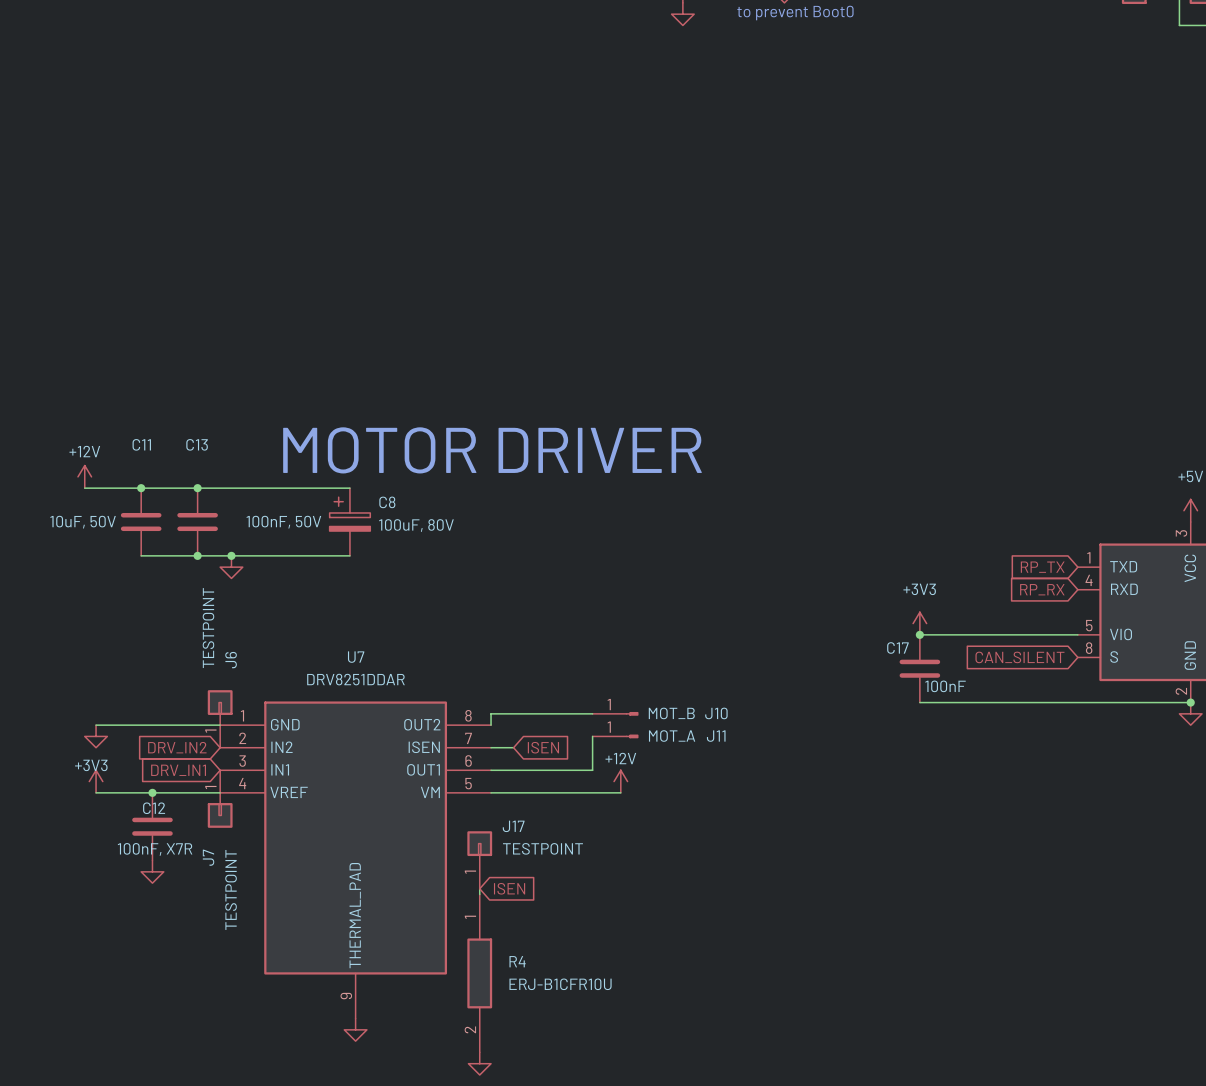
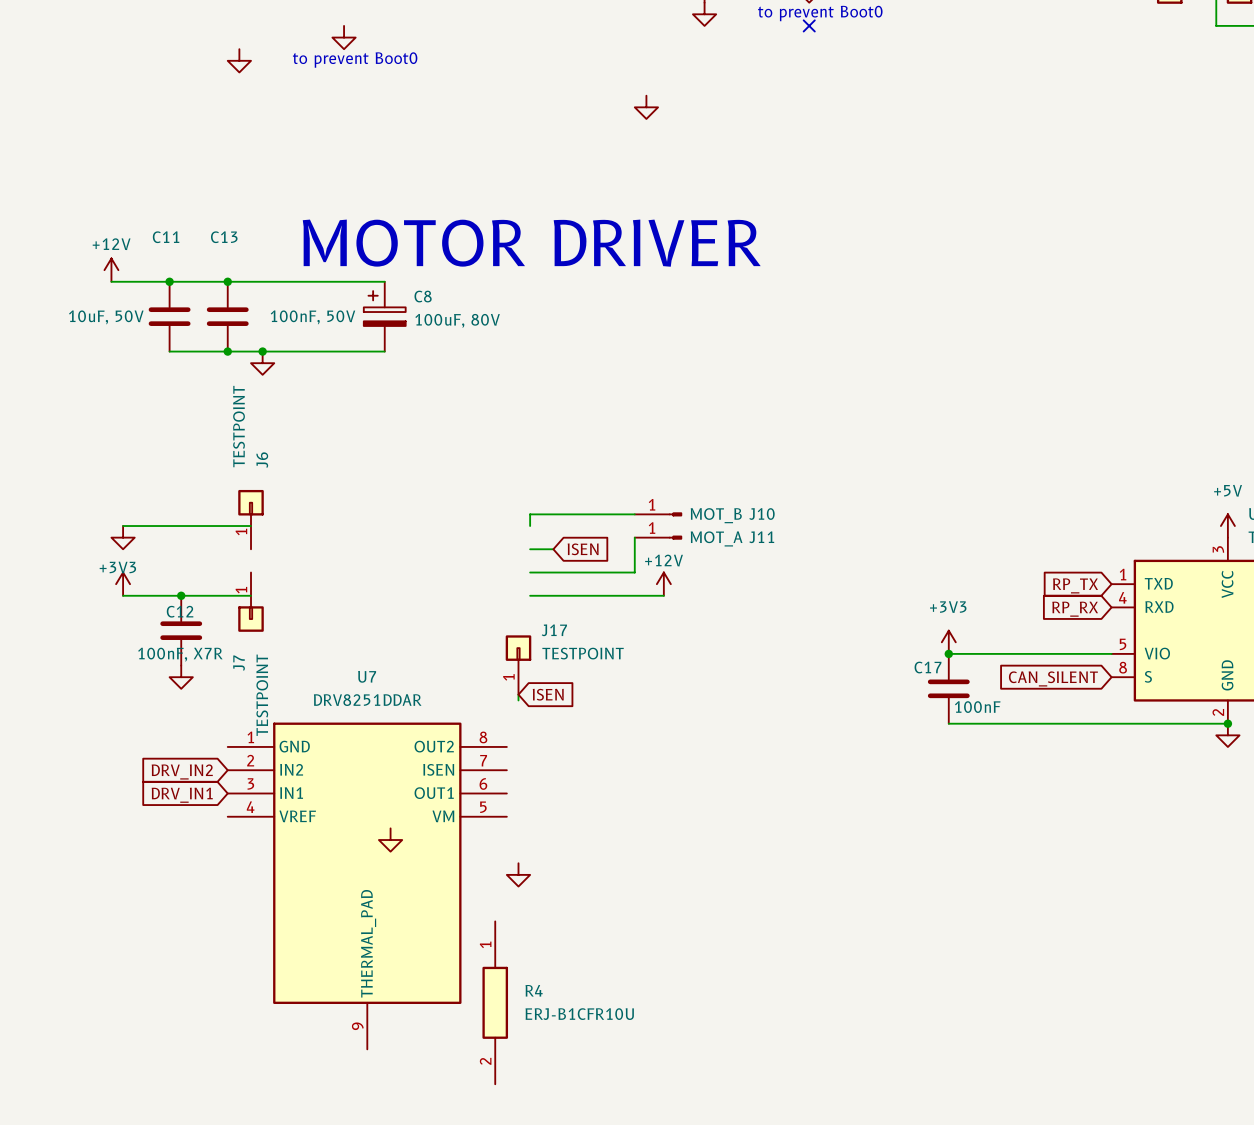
no-connect mark: none -> (809, 25)
power symbol: none -> (344, 37)
text: none -> to prevent Boot0 (355, 60)
power symbol: none -> (239, 60)
power symbol: none -> (646, 107)
junction: none -> (169, 281)
junction: none -> (227, 281)
junction: none -> (227, 351)
junction: none -> (262, 351)
power symbol: none -> (262, 363)
text position: MOTOR DRIVER (492, 450) -> MOTOR DRIVER (531, 243)
power symbol position: +12V (84, 476) -> +12V (111, 270)
wire: (84, 488) (349, 488) -> (111, 281) (384, 281)
junction: (141, 488) -> none
junction: (197, 488) -> none
power symbol: none -> (123, 537)
C11 position: (141, 522) -> (169, 316)
C13 position: (197, 522) -> (227, 316)
C8 position: (349, 522) -> (384, 316)
global label: none -> ISEN (583, 549)
wire: (141, 555) (349, 555) -> (169, 351) (384, 351)
junction: (197, 555) -> none
junction: (231, 555) -> none
power symbol: (231, 567) -> none
junction: none -> (181, 595)
power symbol: none -> (181, 677)
wire: (592, 713) (491, 713) (491, 725) -> (634, 514) (530, 514) (530, 526)
J10 position: (615, 713) -> (658, 514)
J6 position: (220, 718) -> (251, 519)
wire: (96, 725) (220, 725) -> (123, 526) (251, 526)
power symbol: (96, 736) -> none
wire: (592, 736) (592, 770) (491, 770) -> (634, 537) (634, 572) (530, 572)
J11 position: (615, 736) -> (658, 537)
wire: (491, 747) (513, 747) -> (530, 549) (553, 549)
global label position: ISEN (543, 747) -> ISEN (548, 694)
power symbol position: +3V3 (96, 781) -> +3V3 (123, 584)
power symbol position: +12V (620, 781) -> +12V (663, 584)
wire: (96, 792) (220, 792) -> (123, 595) (251, 595)
junction: (152, 792) -> none
wire: (491, 792) (620, 792) -> (530, 595) (663, 595)
J7 position: (220, 799) -> (251, 602)
power symbol: none -> (390, 840)
C12 position: (152, 826) -> (181, 630)
power symbol: none -> (518, 874)
J17 position: (479, 860) -> (518, 664)
power symbol: (152, 871) -> none
wire: (479, 888) (479, 894) -> (518, 694) (518, 700)
global label: ISEN (509, 888) -> none
power symbol: (355, 1029) -> none
power symbol: (479, 1063) -> none

